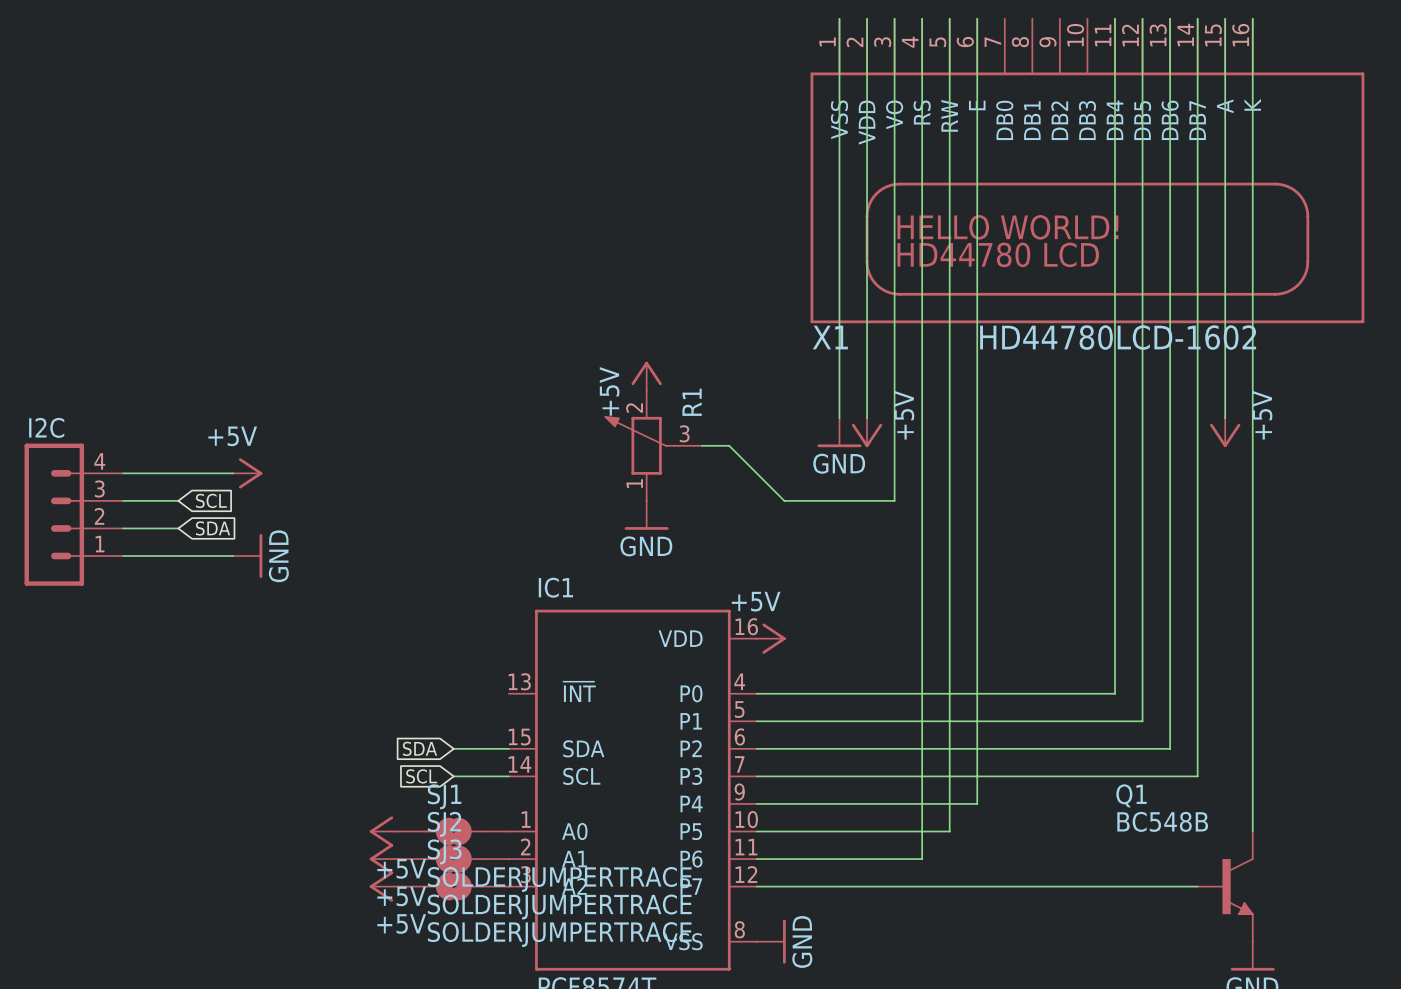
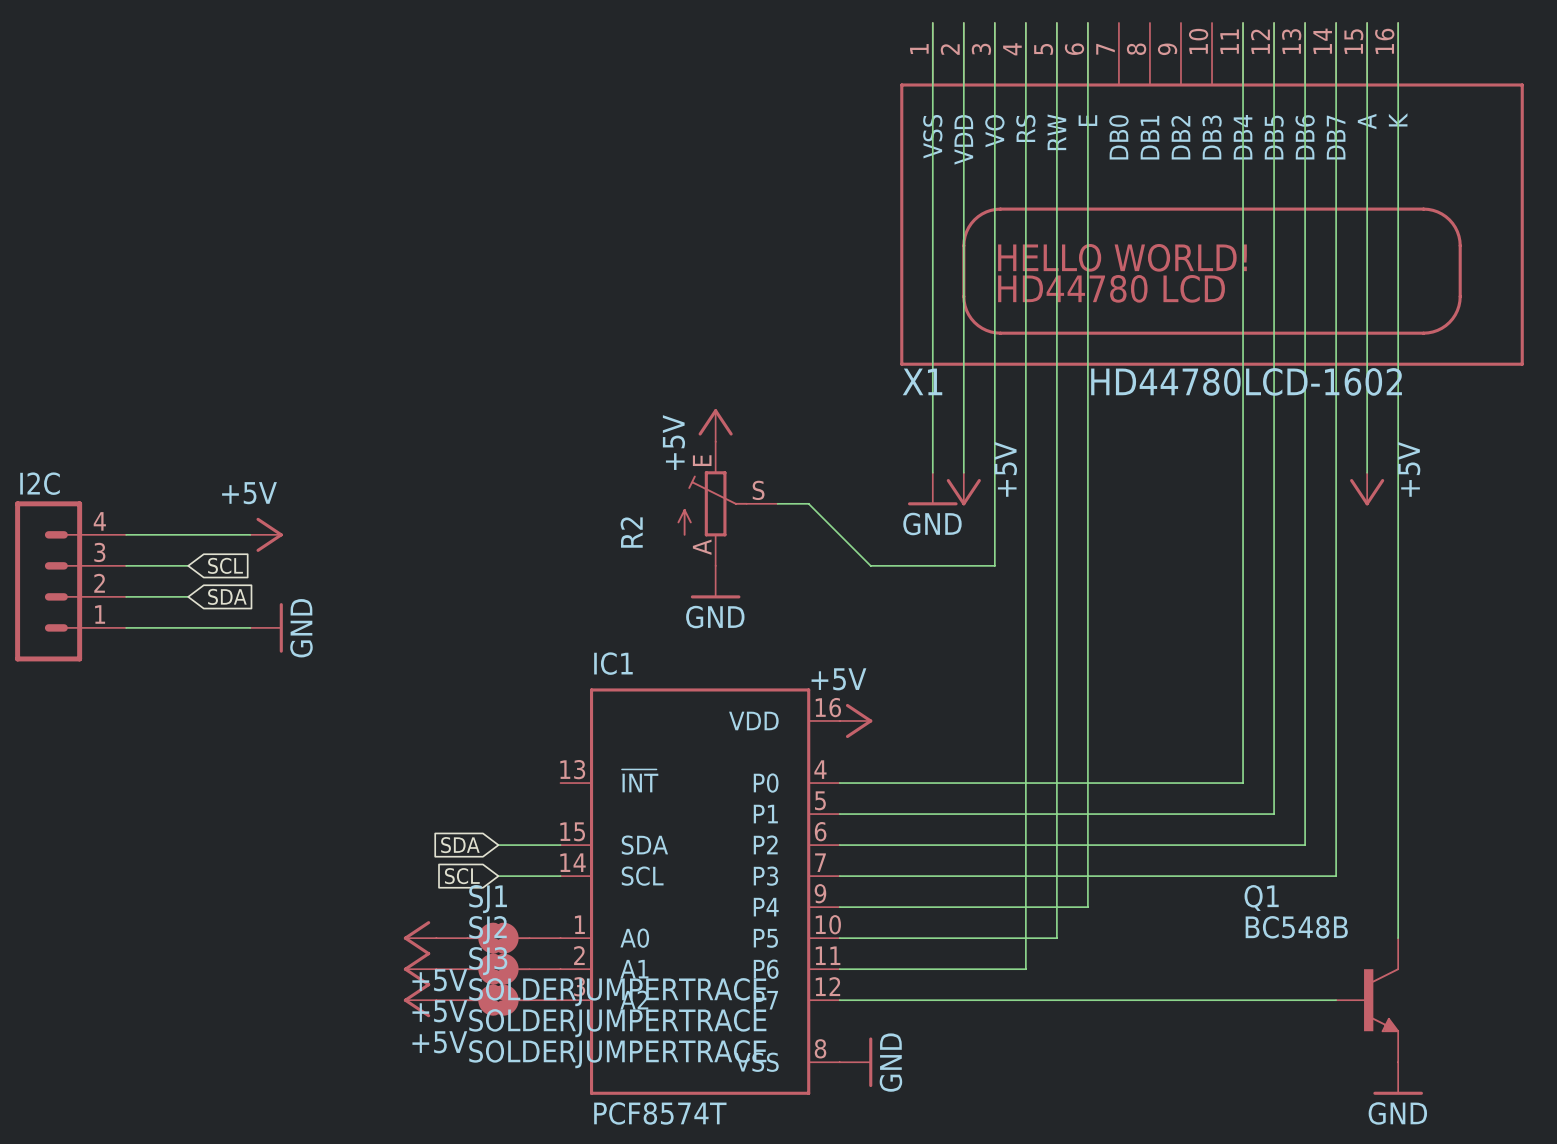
R1: (653, 445) -> none
R2: none -> (727, 503)

